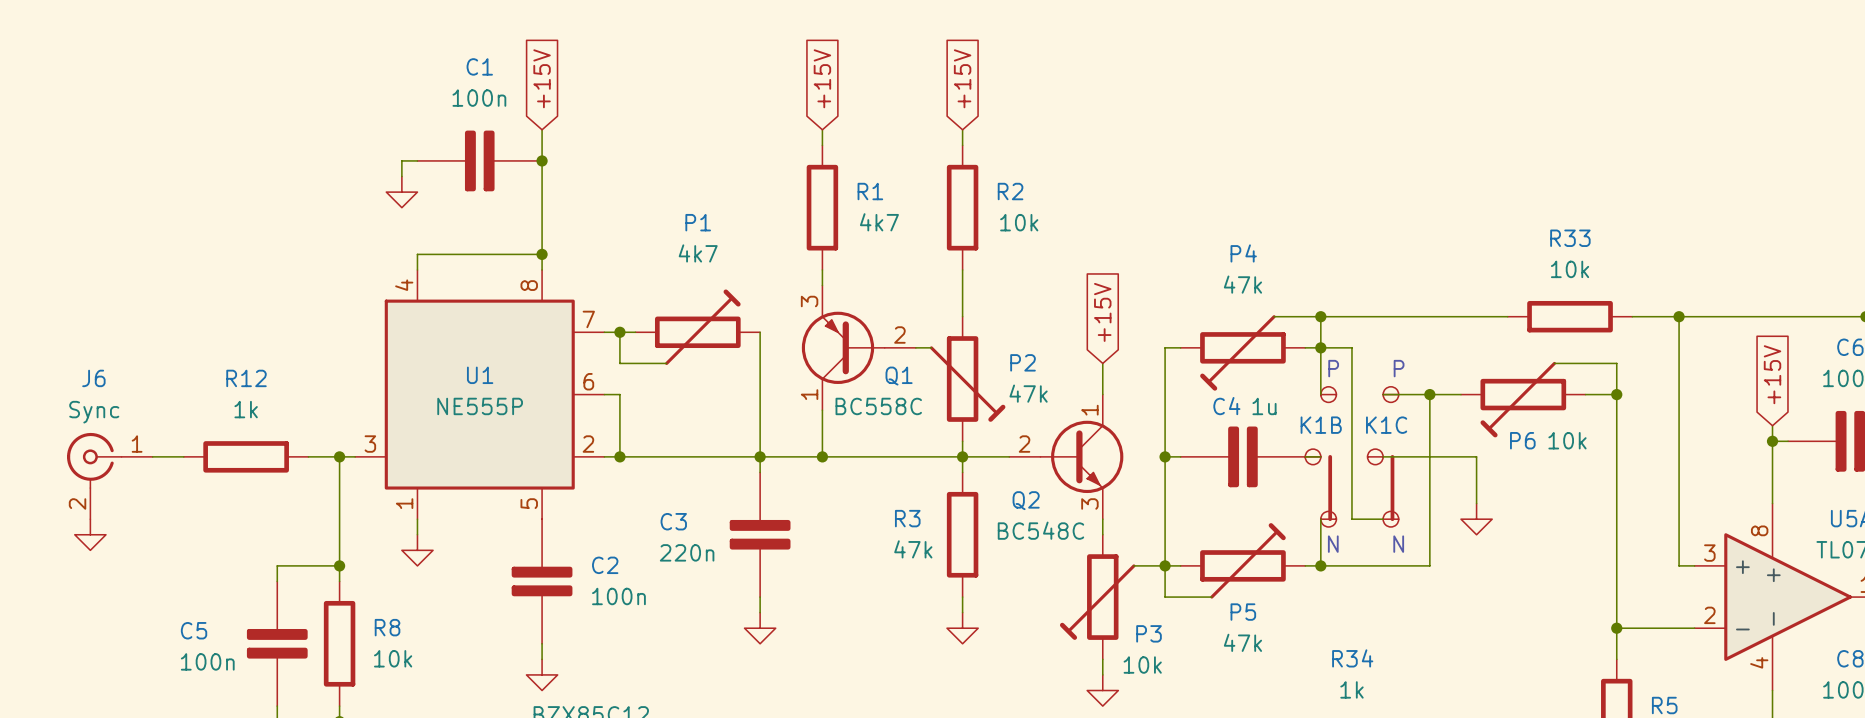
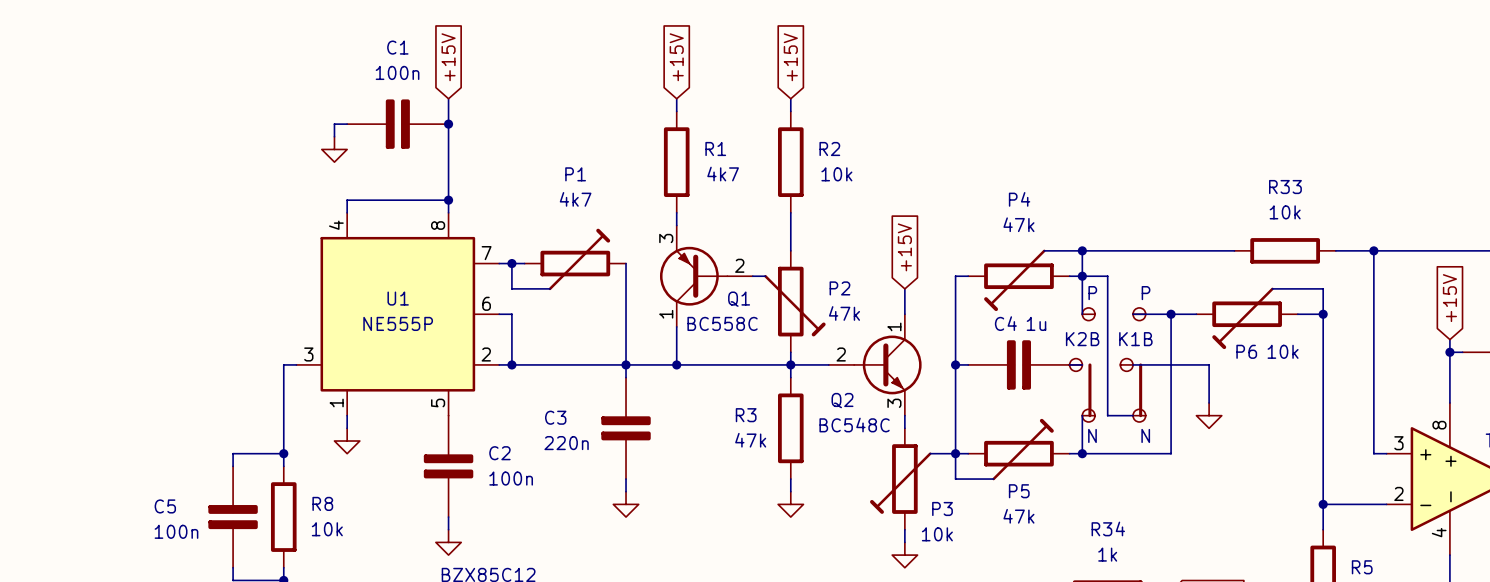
K1B name: K1B (1321, 425) -> K2B (1082, 339)
K1C name: K1C (1386, 425) -> K1B (1135, 339)
wire: (152, 456) (183, 456) -> none
R12: 1k (246, 456) -> none
wire: (308, 456) (339, 456) -> none
junction: (339, 456) -> none
J6: Sync (109, 476) -> none
power symbol: (90, 534) -> none

